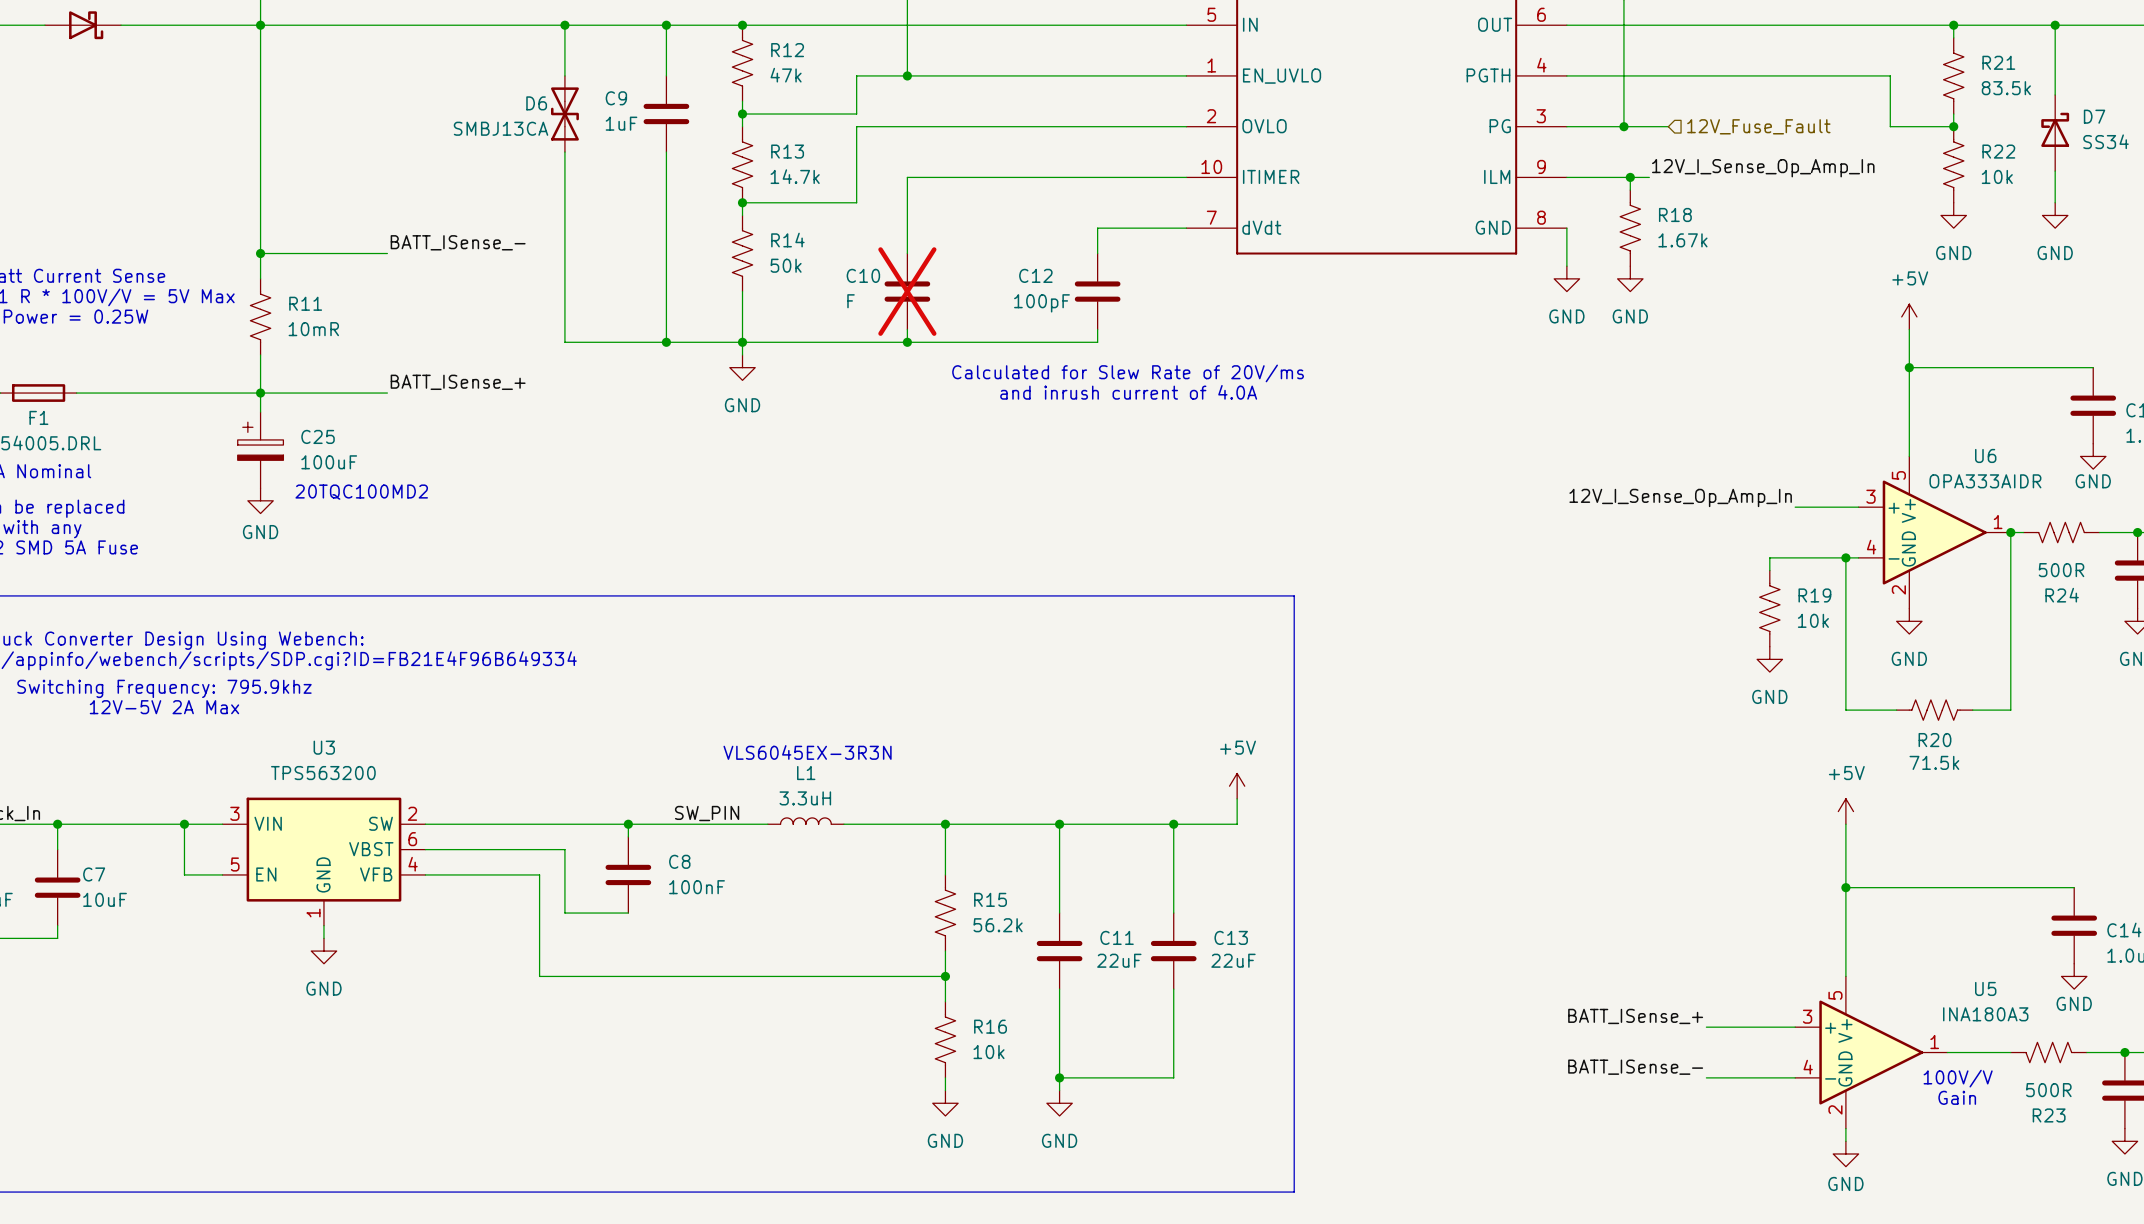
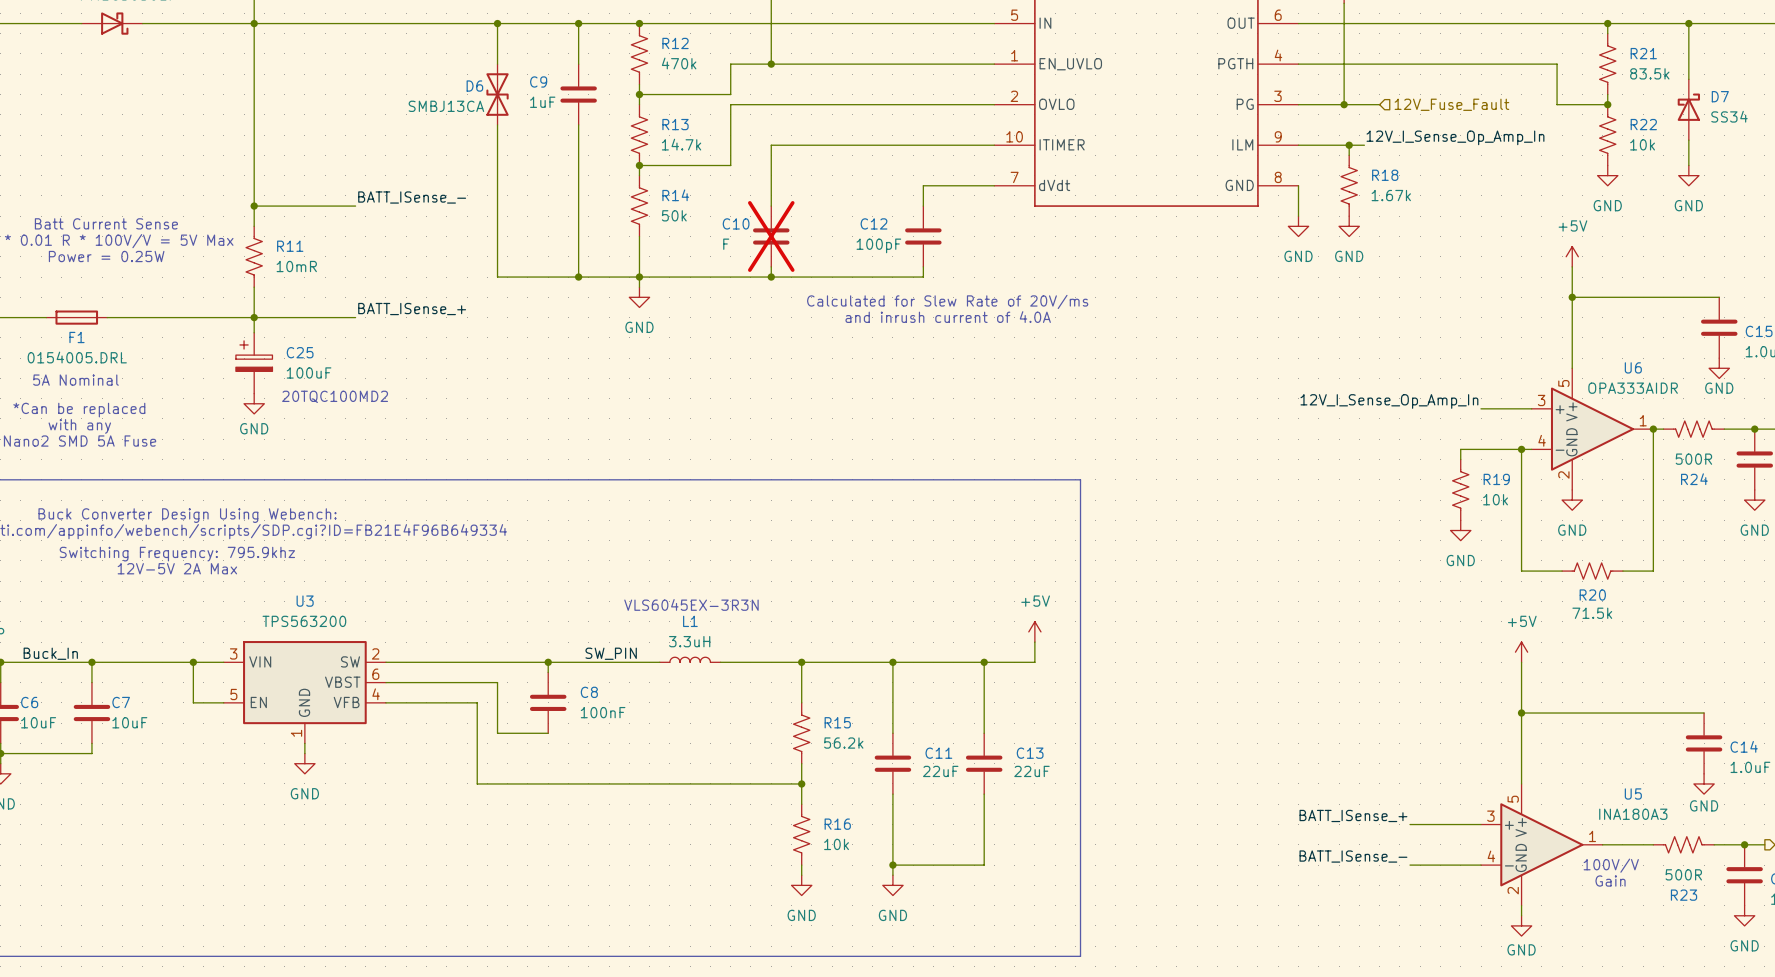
R12 value: 47k (786, 75) -> 470k (679, 63)

